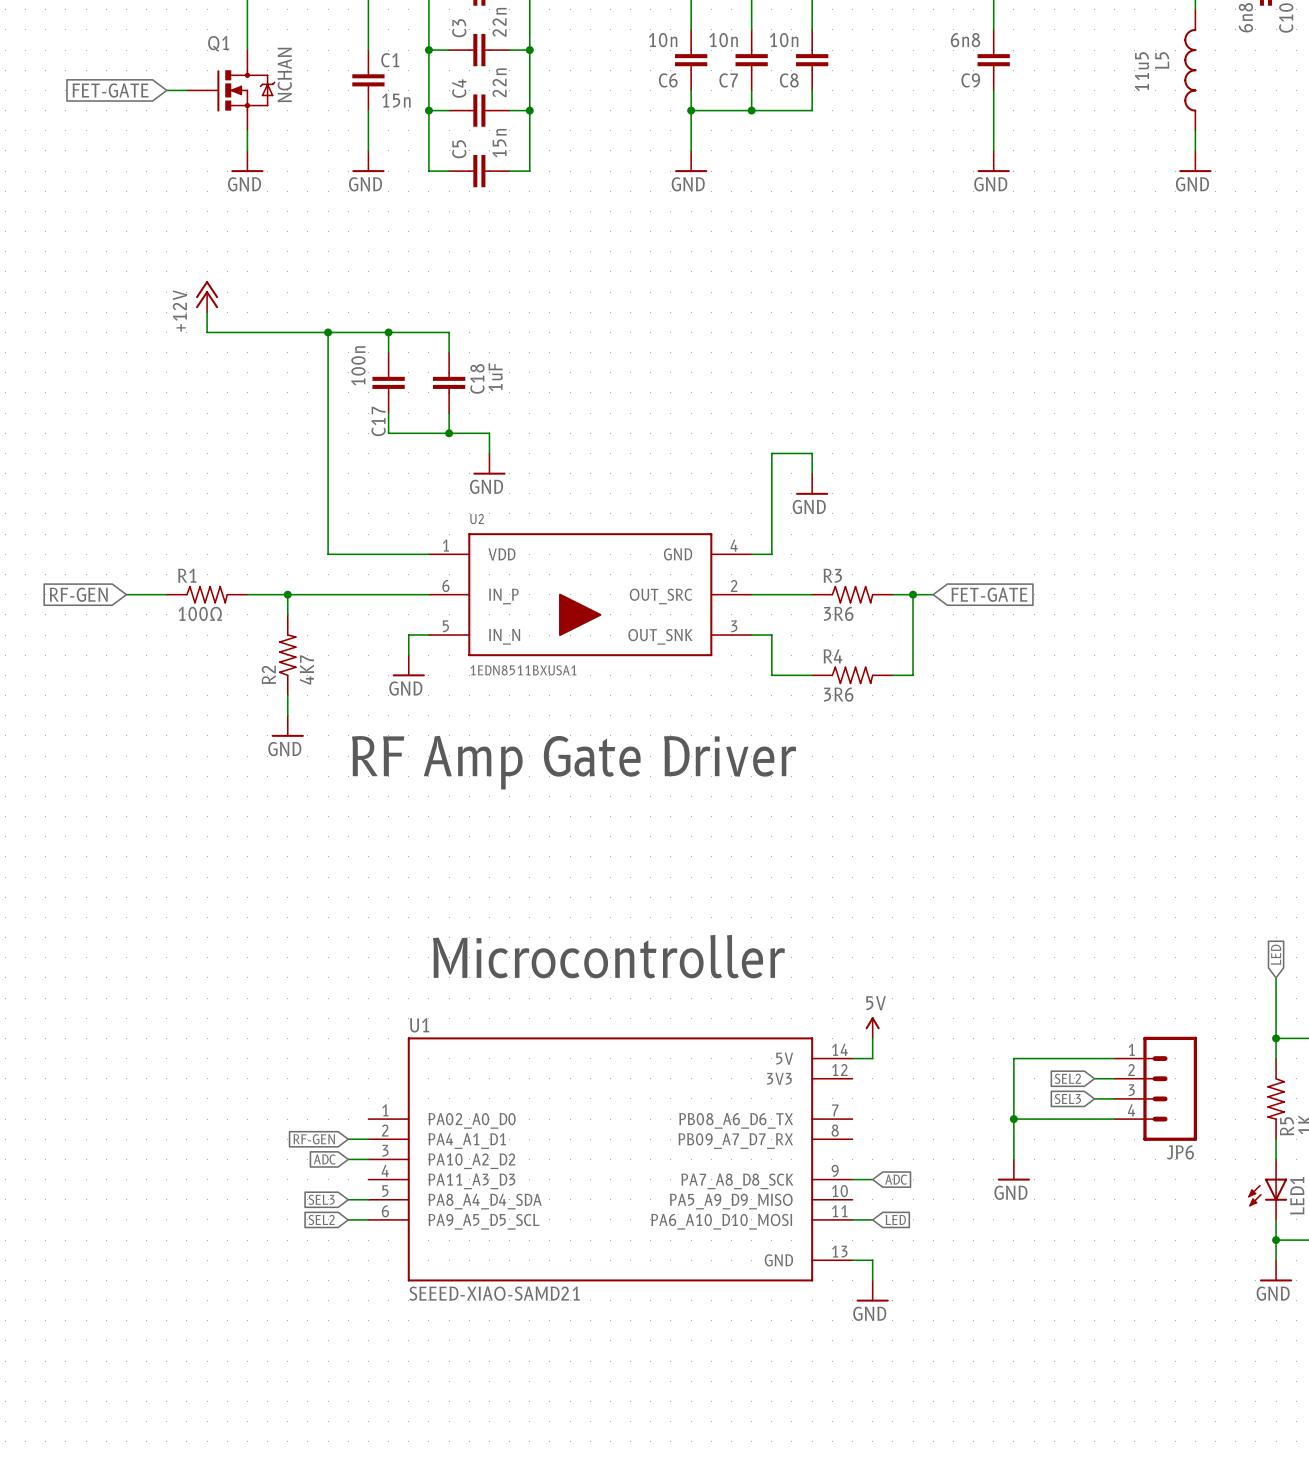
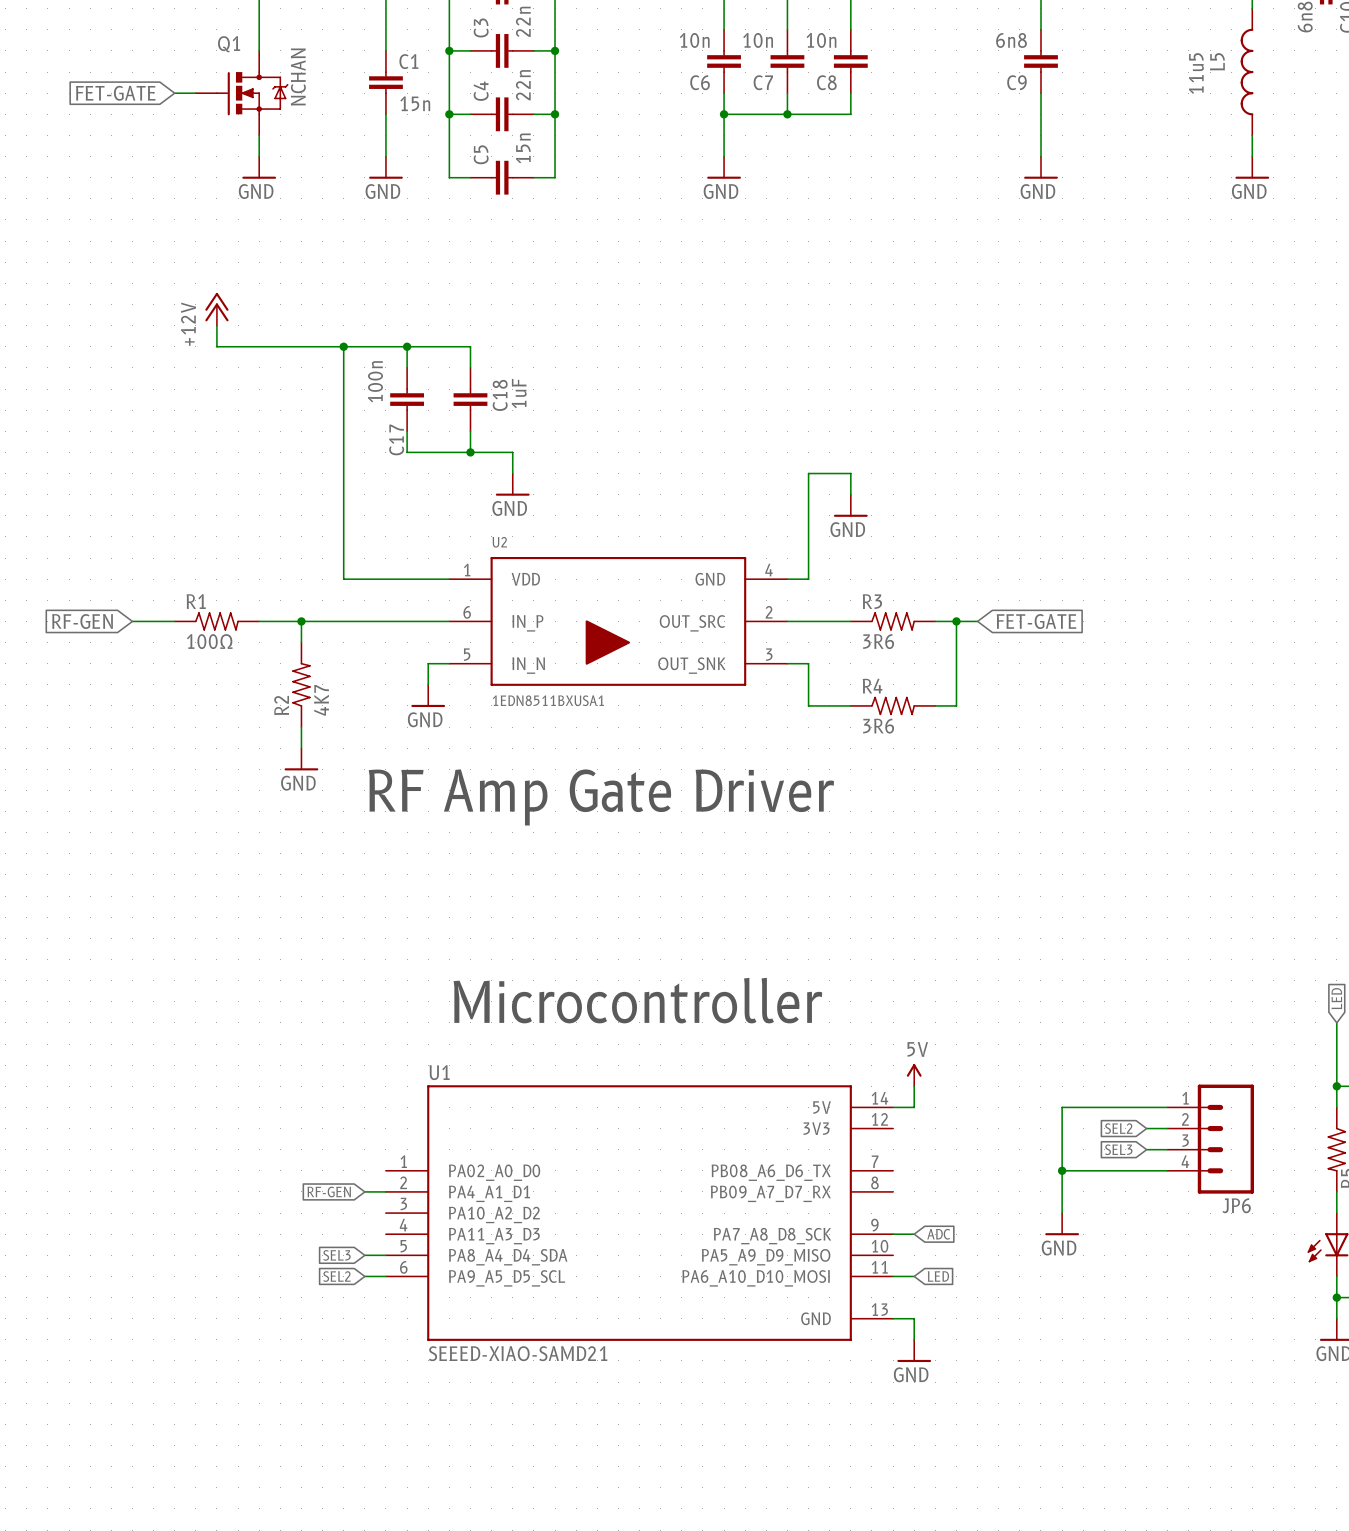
global label: ADC (324, 1159) -> none
wire: (348, 1159) (368, 1159) -> none

